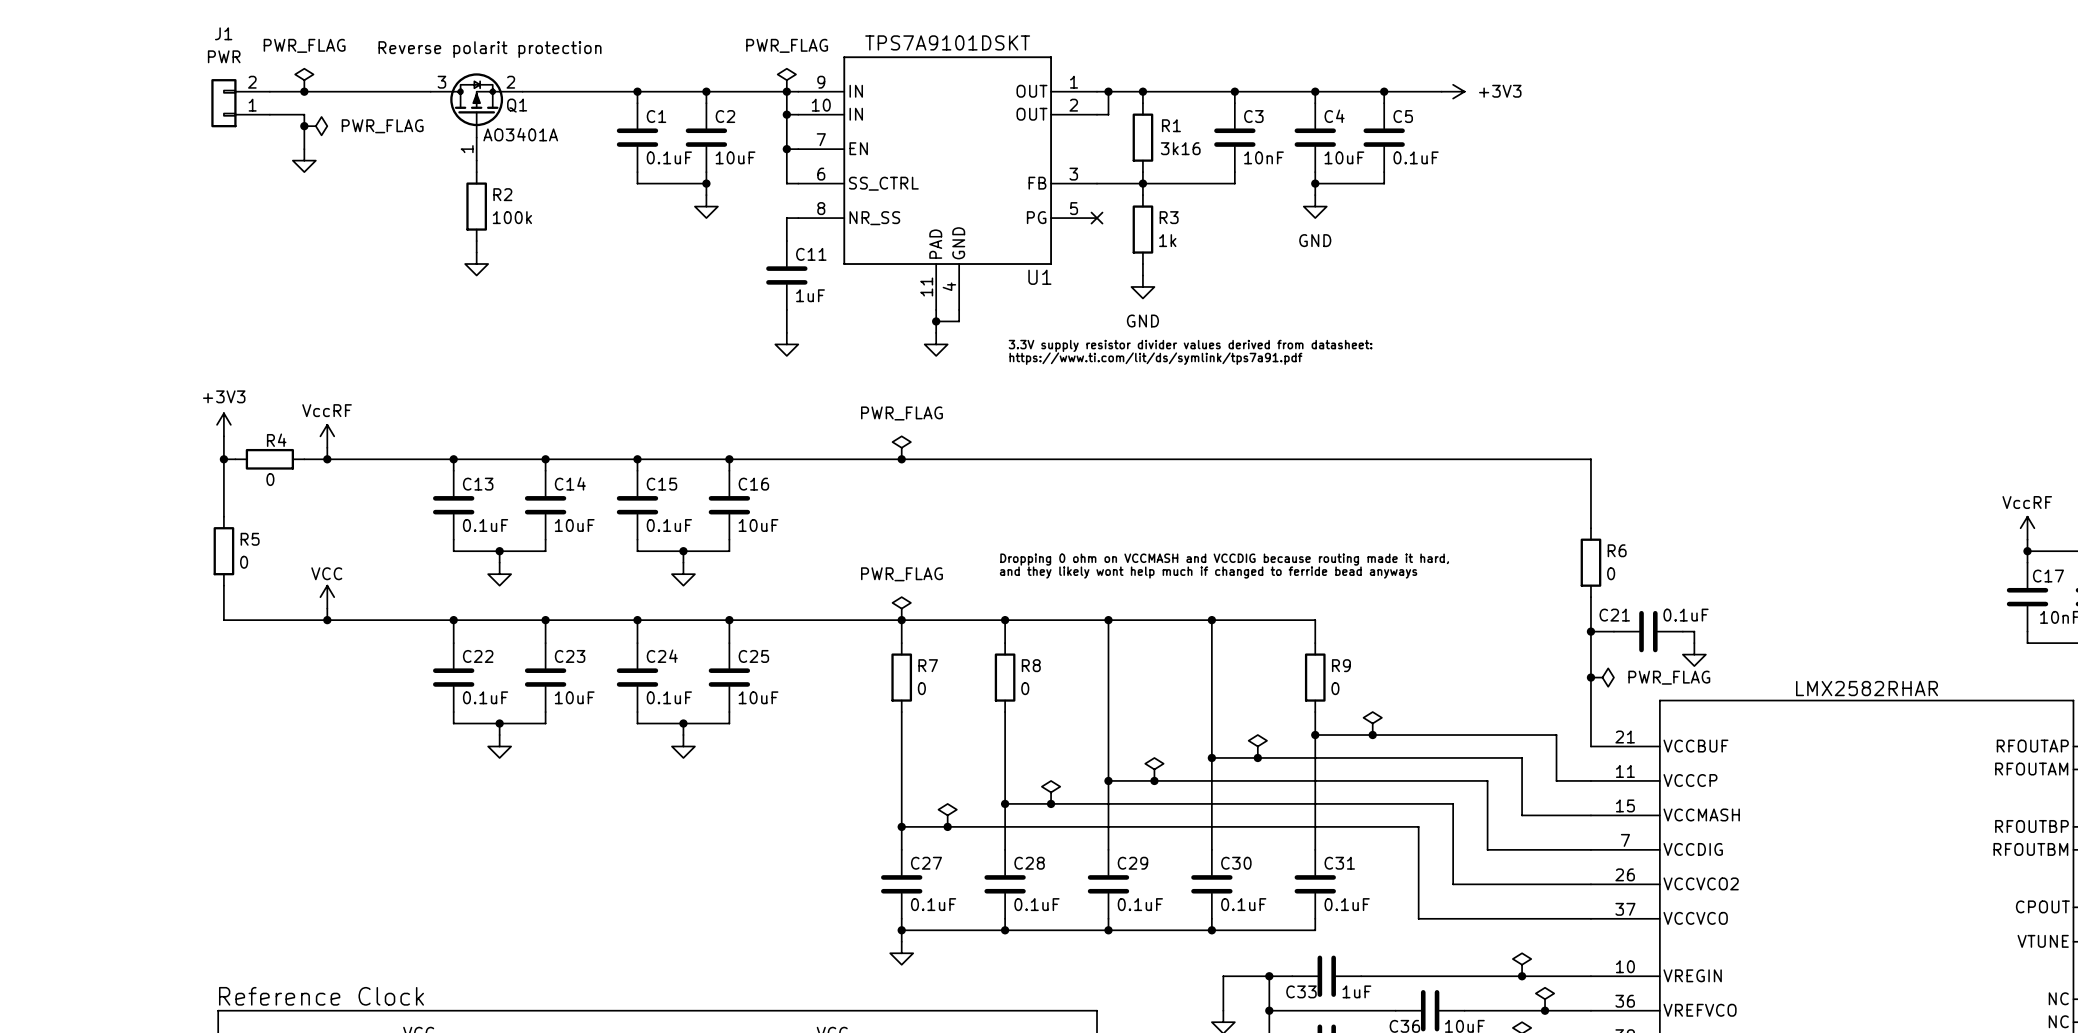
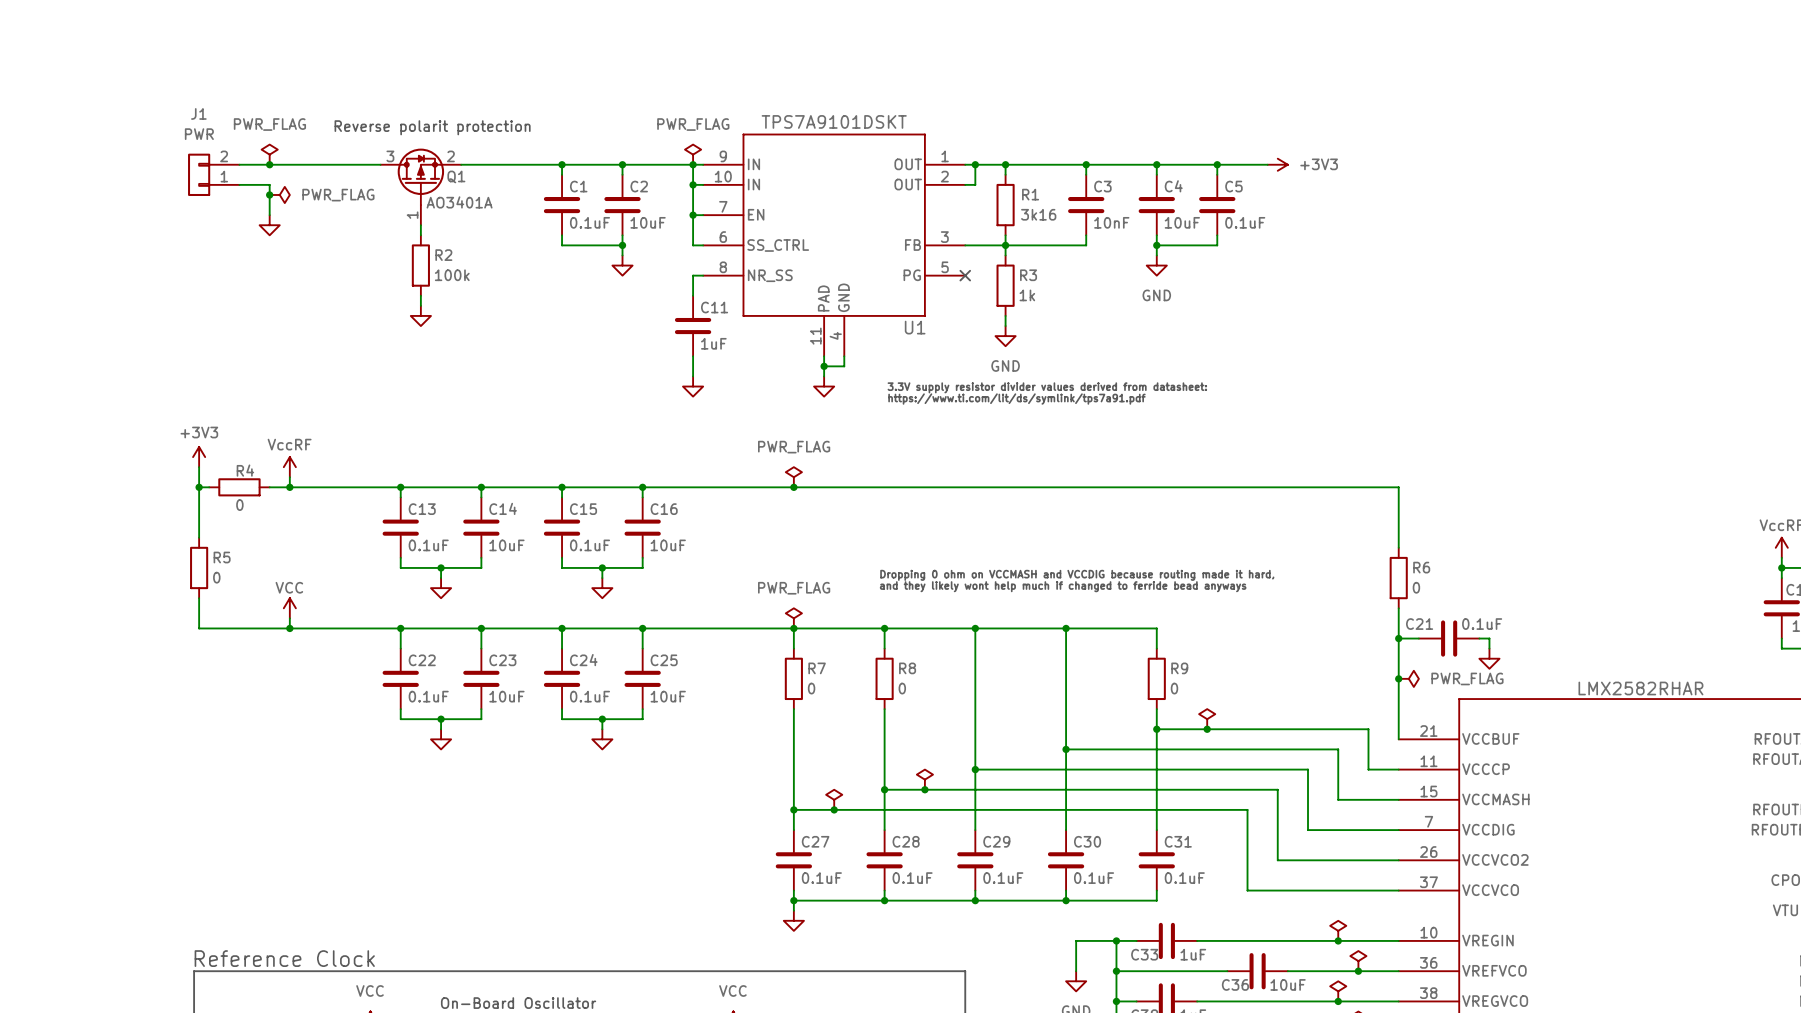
power symbol: (1257, 746) -> none
junction: (1257, 757) -> none
power symbol: (1154, 769) -> none
junction: (1154, 780) -> none

